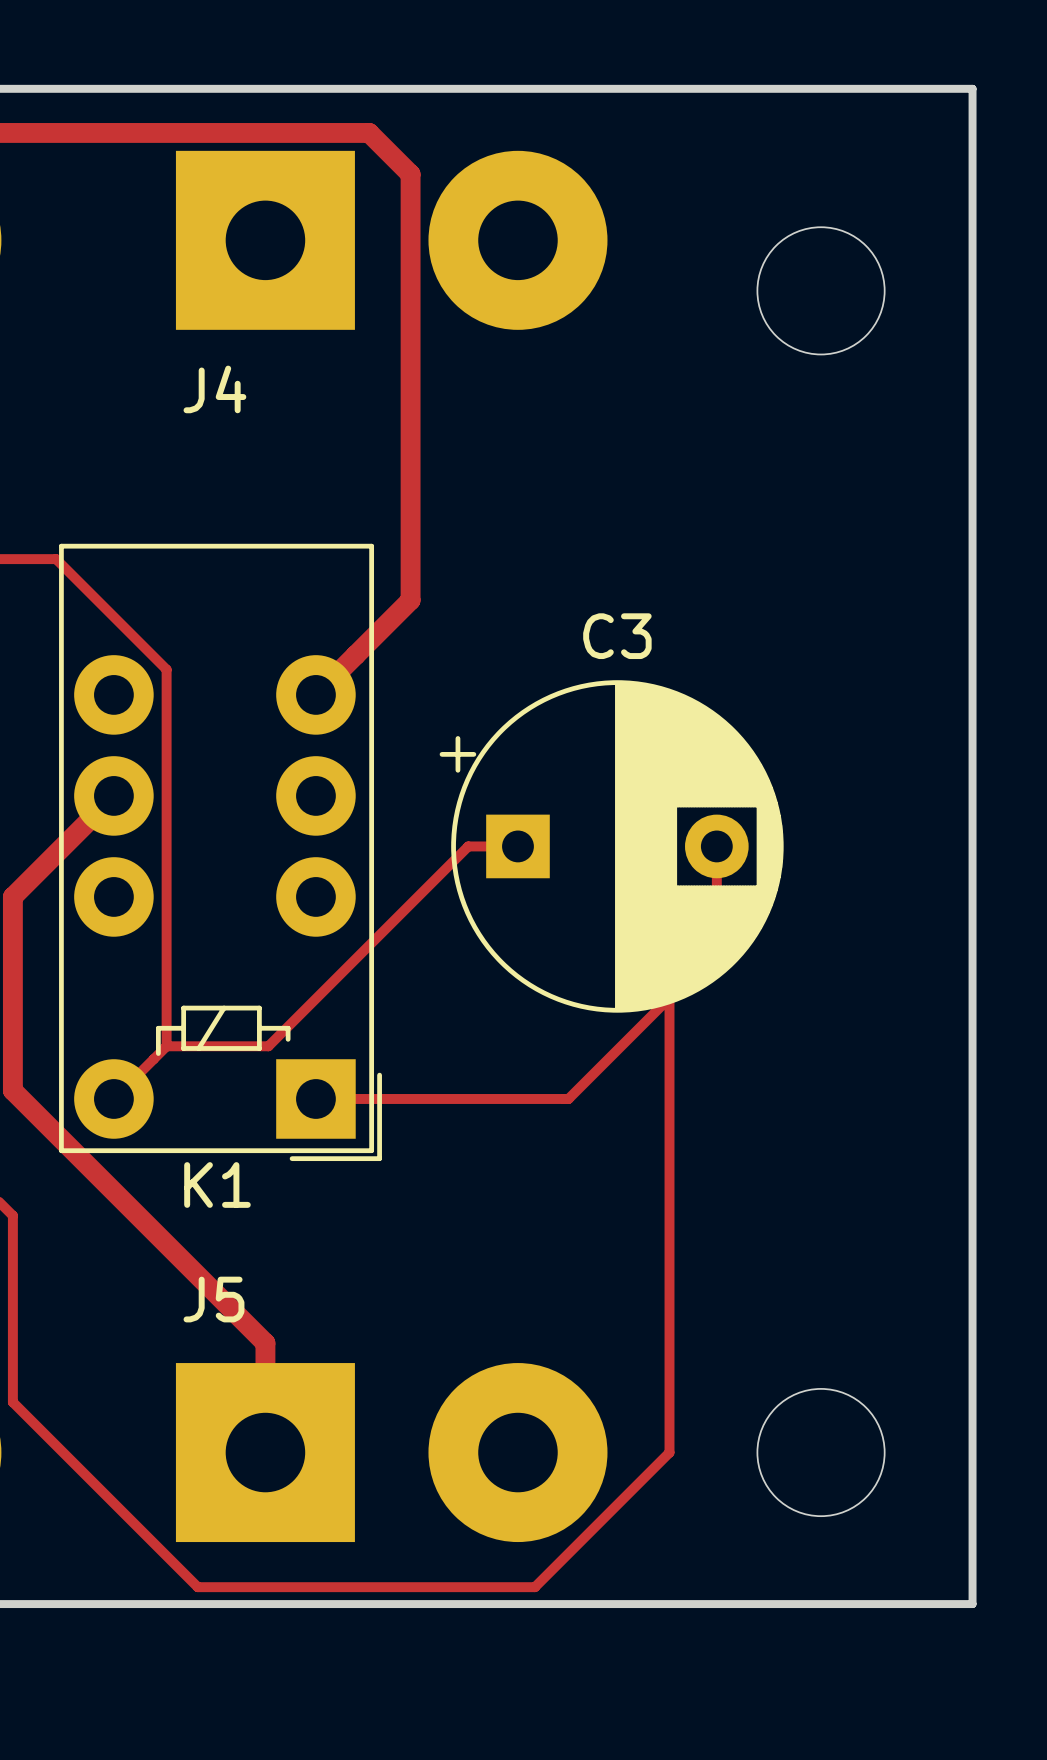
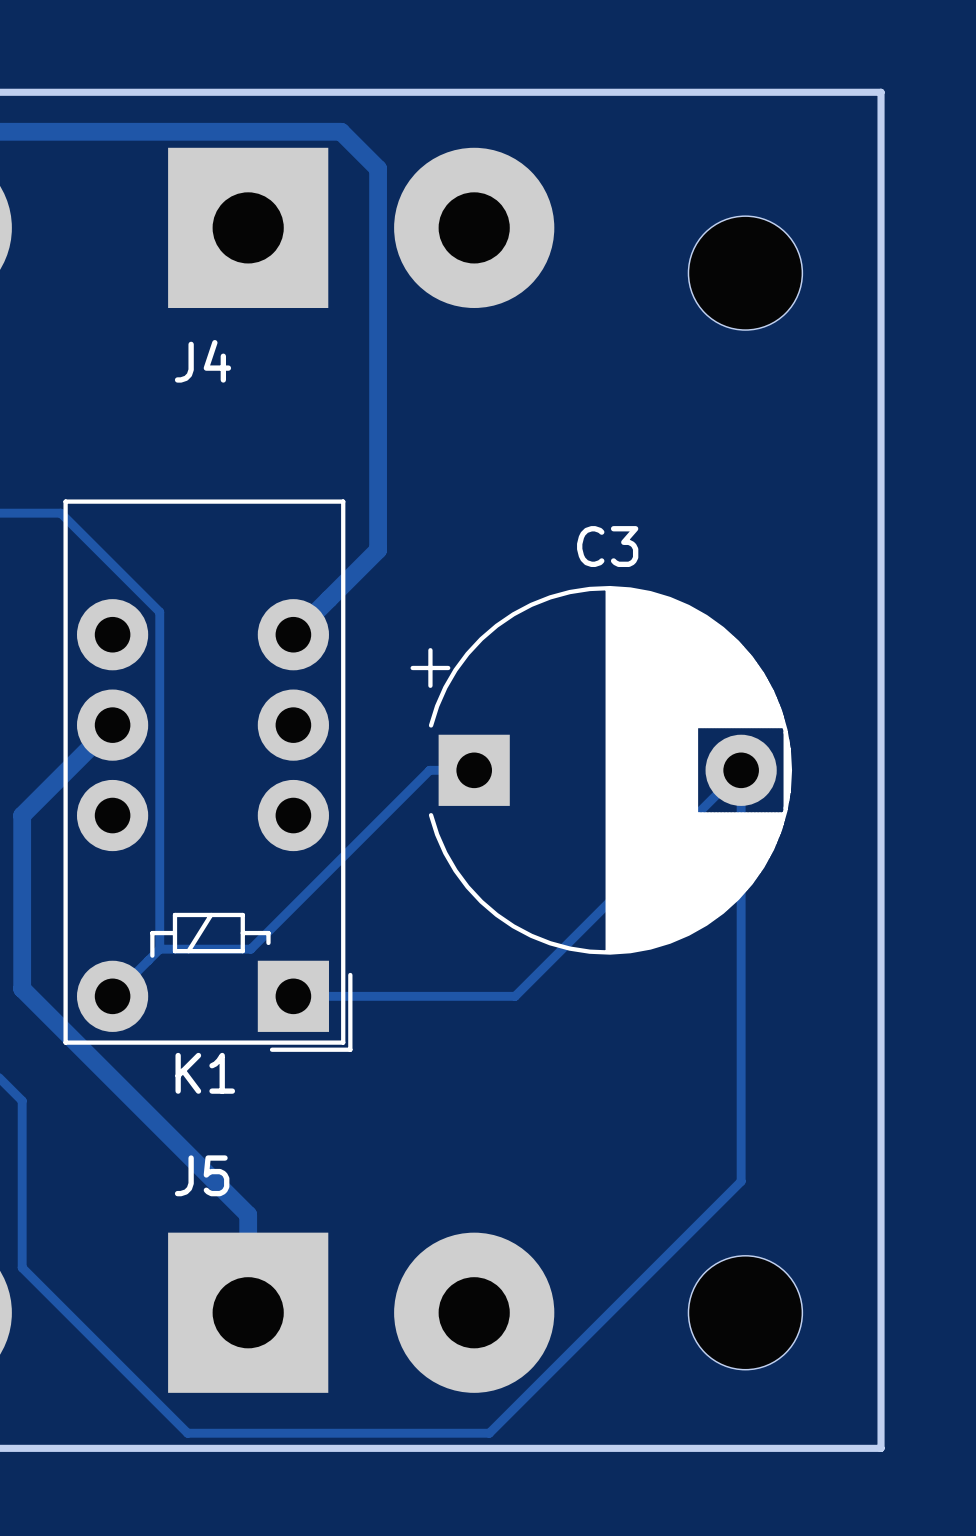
C3 footprint: [439, 680, 784, 1013] -> [410, 585, 793, 955]
track: (716, 846) (716, 950) (568, 1098) (563, 1098) -> none
track: (669, 997) (669, 1452) -> (515, 996) (741, 770) (741, 1181) (609, 1312)

